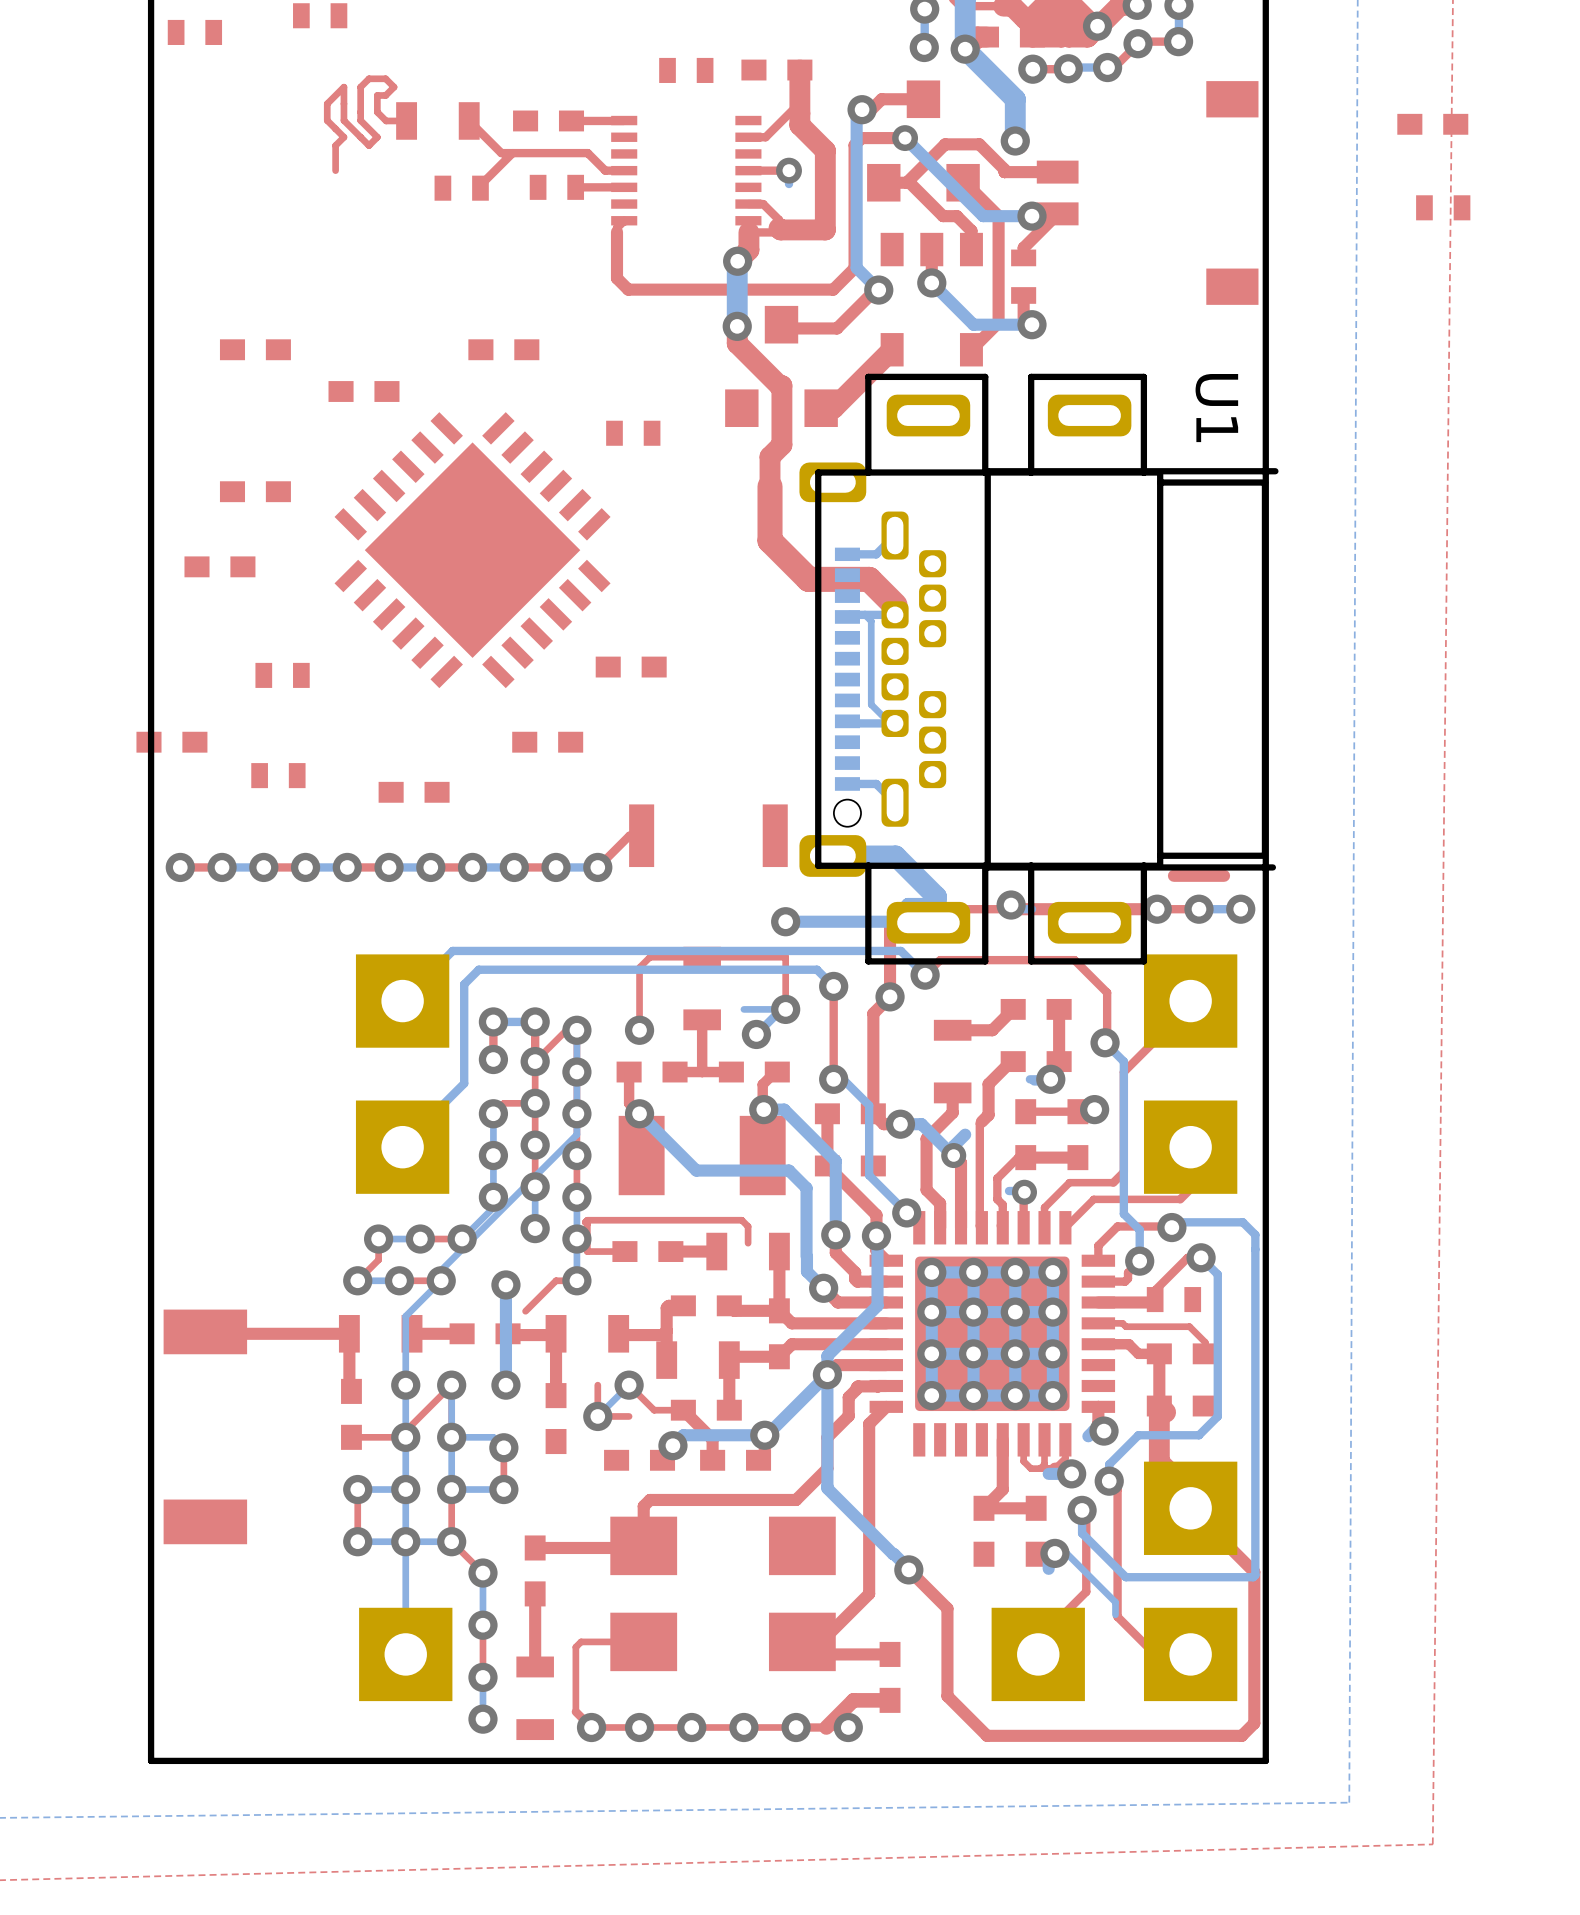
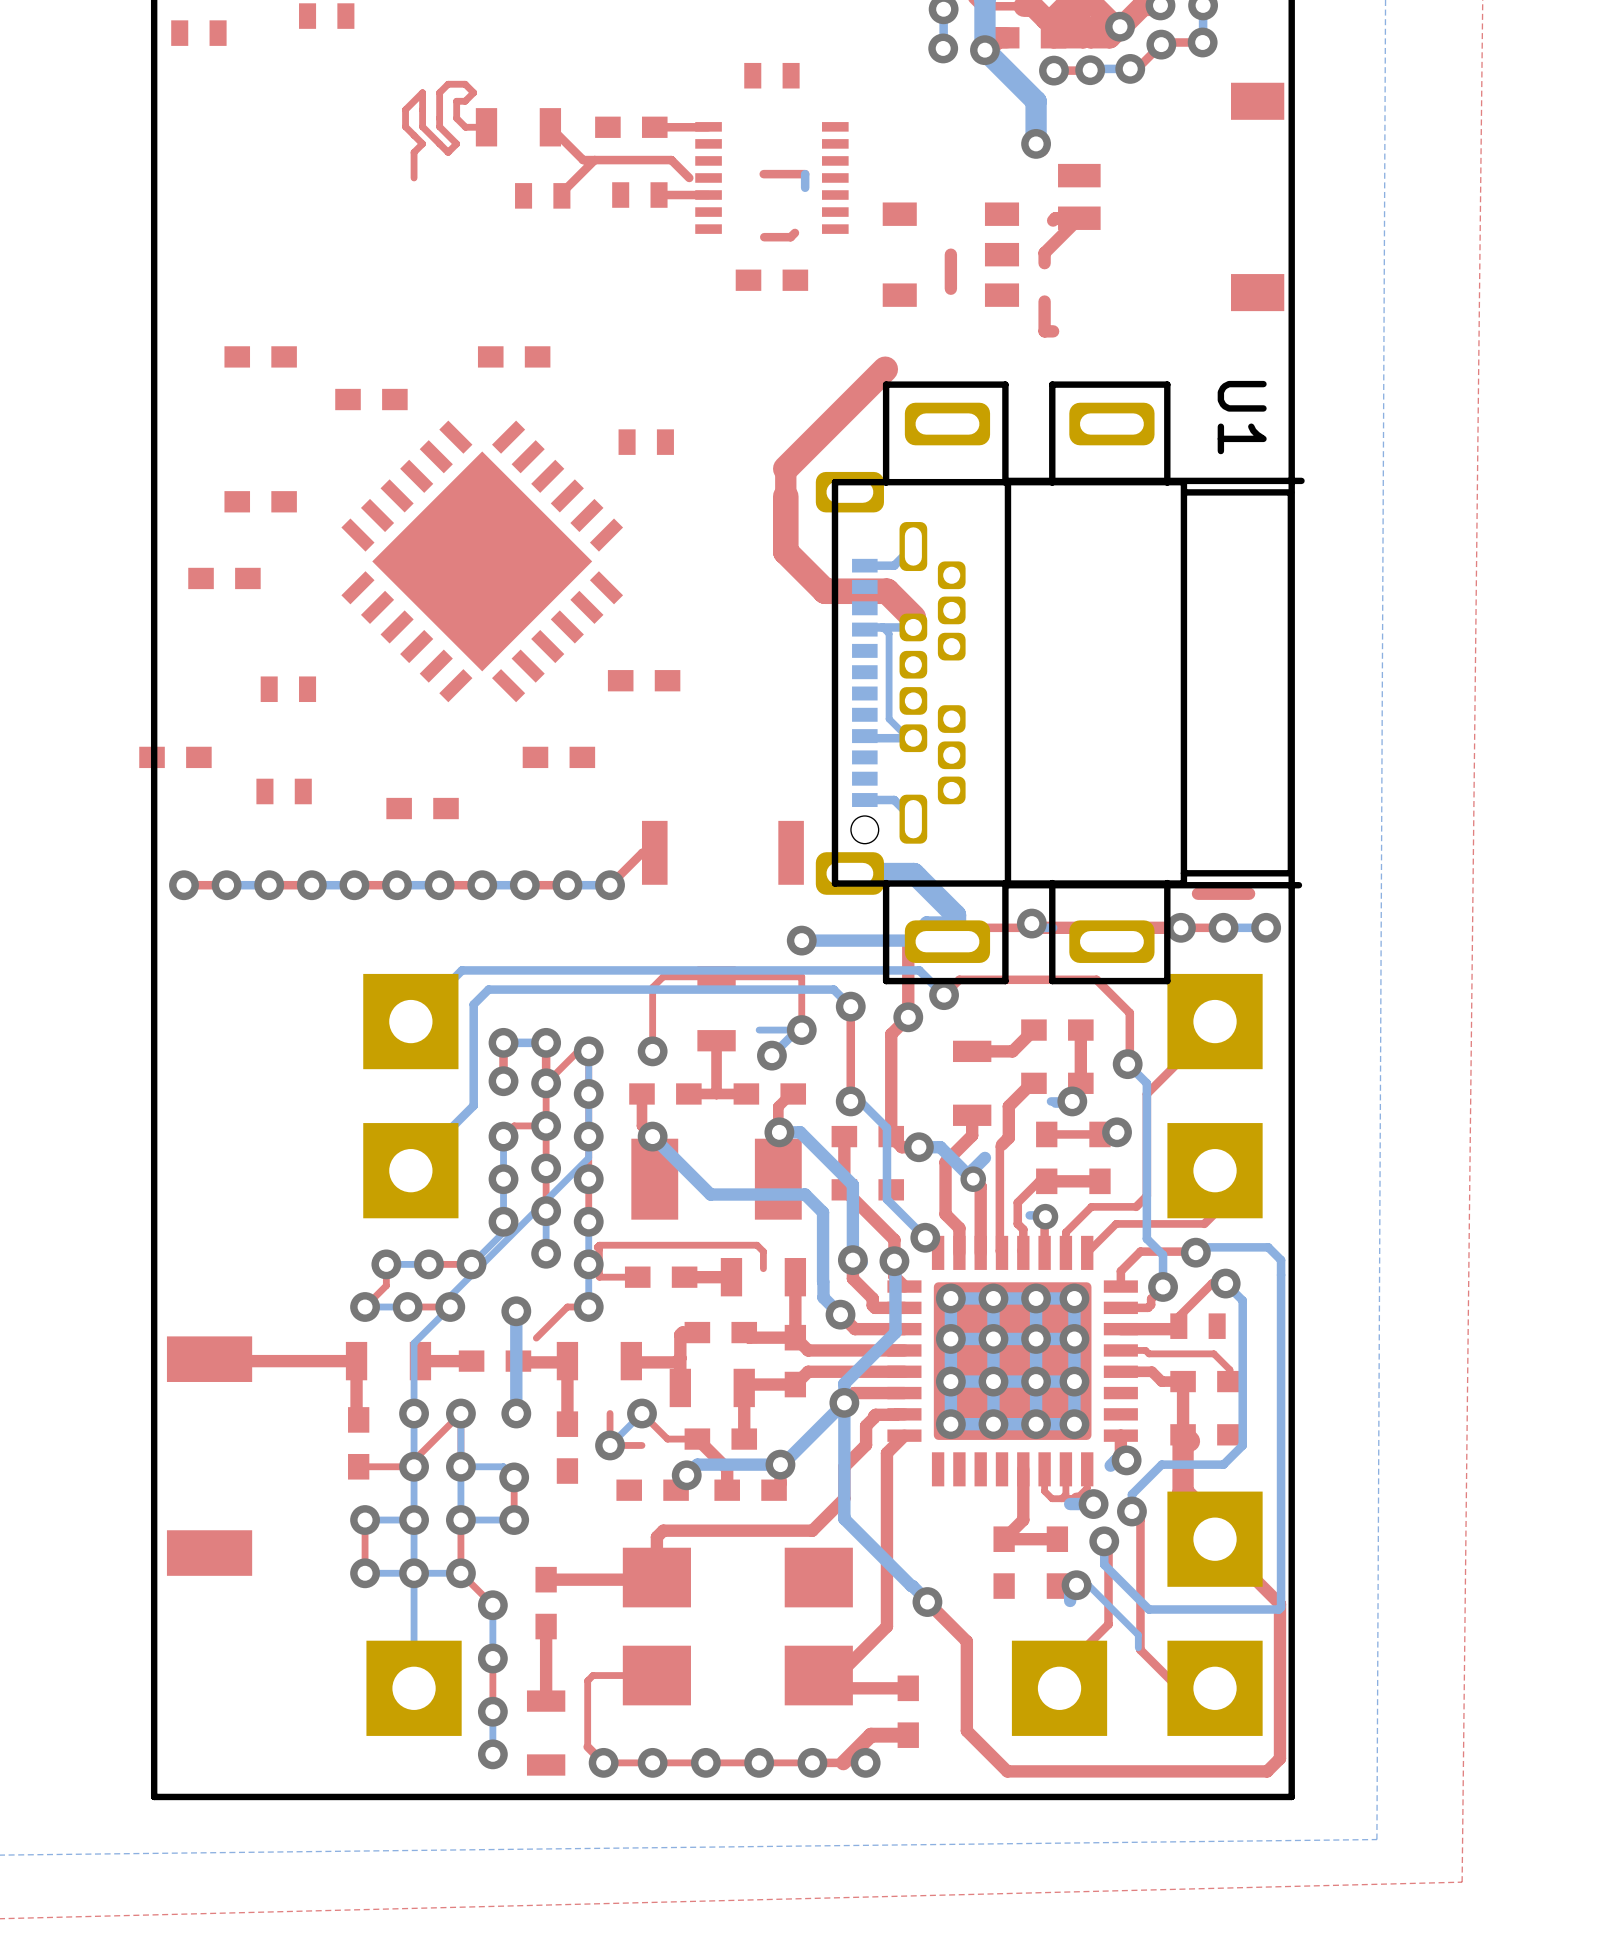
part footprint: [741, 59, 813, 81] -> [744, 62, 800, 89]
part: (686, 70) -> none
top track: (799, 70) (799, 125) (825, 150) (825, 229) (780, 229) (778, 219) (763, 204) (748, 204) -> none
top track: (923, 99) (881, 99) (871, 109) (862, 109) -> none
bottom track: (862, 109) (856, 115) (856, 267) (878, 290) -> none
via: (862, 109) -> none
top track: (799, 113) (796, 106) (765, 137) (748, 137) -> none
top track: (406, 120) (386, 120) (377, 112) (377, 95) (385, 95) (394, 87) (385, 78) (369, 78) (360, 87) (360, 120) (377, 137) (369, 145) (343, 120) (343, 87) (327, 103) (327, 120) (343, 137) (335, 145) (335, 170) -> (486, 127) (465, 127) (456, 118) (456, 101) (465, 101) (473, 92) (465, 84) (448, 84) (439, 92) (439, 126) (456, 143) (448, 152) (422, 126) (422, 92) (405, 109) (405, 126) (422, 143) (414, 152) (414, 177)
part position: (437, 120) -> (518, 127)
top track: (469, 120) (501, 153) (587, 153) (605, 170) (624, 170) -> none
part position: (548, 120) -> (631, 127)
top track: (623, 120) (571, 120) -> (708, 127) (654, 127)
top track: none -> (550, 127) (583, 160) (671, 160) (689, 177)
part: (1432, 124) -> none
bottom track: (905, 138) (983, 216) (1031, 216) -> none
top track: (905, 138) (861, 138) (854, 145) (854, 268) (833, 289) (628, 289) (617, 278) (617, 227) (624, 221) -> none
via: (905, 138) -> none
part: (923, 141) -> none
top track: (512, 153) (480, 185) (480, 188) -> (594, 160) (561, 192) (561, 195)
part position: (686, 170) -> (771, 177)
via: (789, 170) -> none
top track: (1057, 172) (1004, 172) (1004, 169) (979, 144) (945, 144) (906, 182) -> none
top track: (883, 182) (909, 182) (943, 216) (956, 216) (971, 230) (971, 249) -> none
top track: (963, 182) (998, 216) (998, 322) (971, 349) -> none
part position: (556, 187) -> (542, 195)
top track: (624, 187) (575, 187) -> (708, 195) (659, 195)
part: (461, 188) -> none
part: none -> (639, 195)
part: (1443, 207) -> none
via: (1031, 216) -> none
top track: (748, 221) (748, 249) (737, 261) -> none
bottom track: (737, 261) (737, 326) -> none
via: (737, 261) -> none
part: none -> (771, 280)
part: (1023, 276) -> none
bottom track: (931, 282) (973, 324) (1031, 324) -> none
via: (931, 282) -> none
top track: (878, 290) (875, 290) (837, 328) (785, 328) (781, 324) -> none
via: (878, 290) -> none
part rotation: 0° (931, 299) -> 90° clockwise (950, 254)
via: (1031, 324) -> none
top track: (737, 326) (737, 343) (779, 385) (781, 385) (781, 444) (770, 456) (770, 459) -> (885, 369) (785, 468)
via: (737, 326) -> none
top track: (892, 349) (833, 408) (821, 408) -> none
part: (781, 366) -> none

